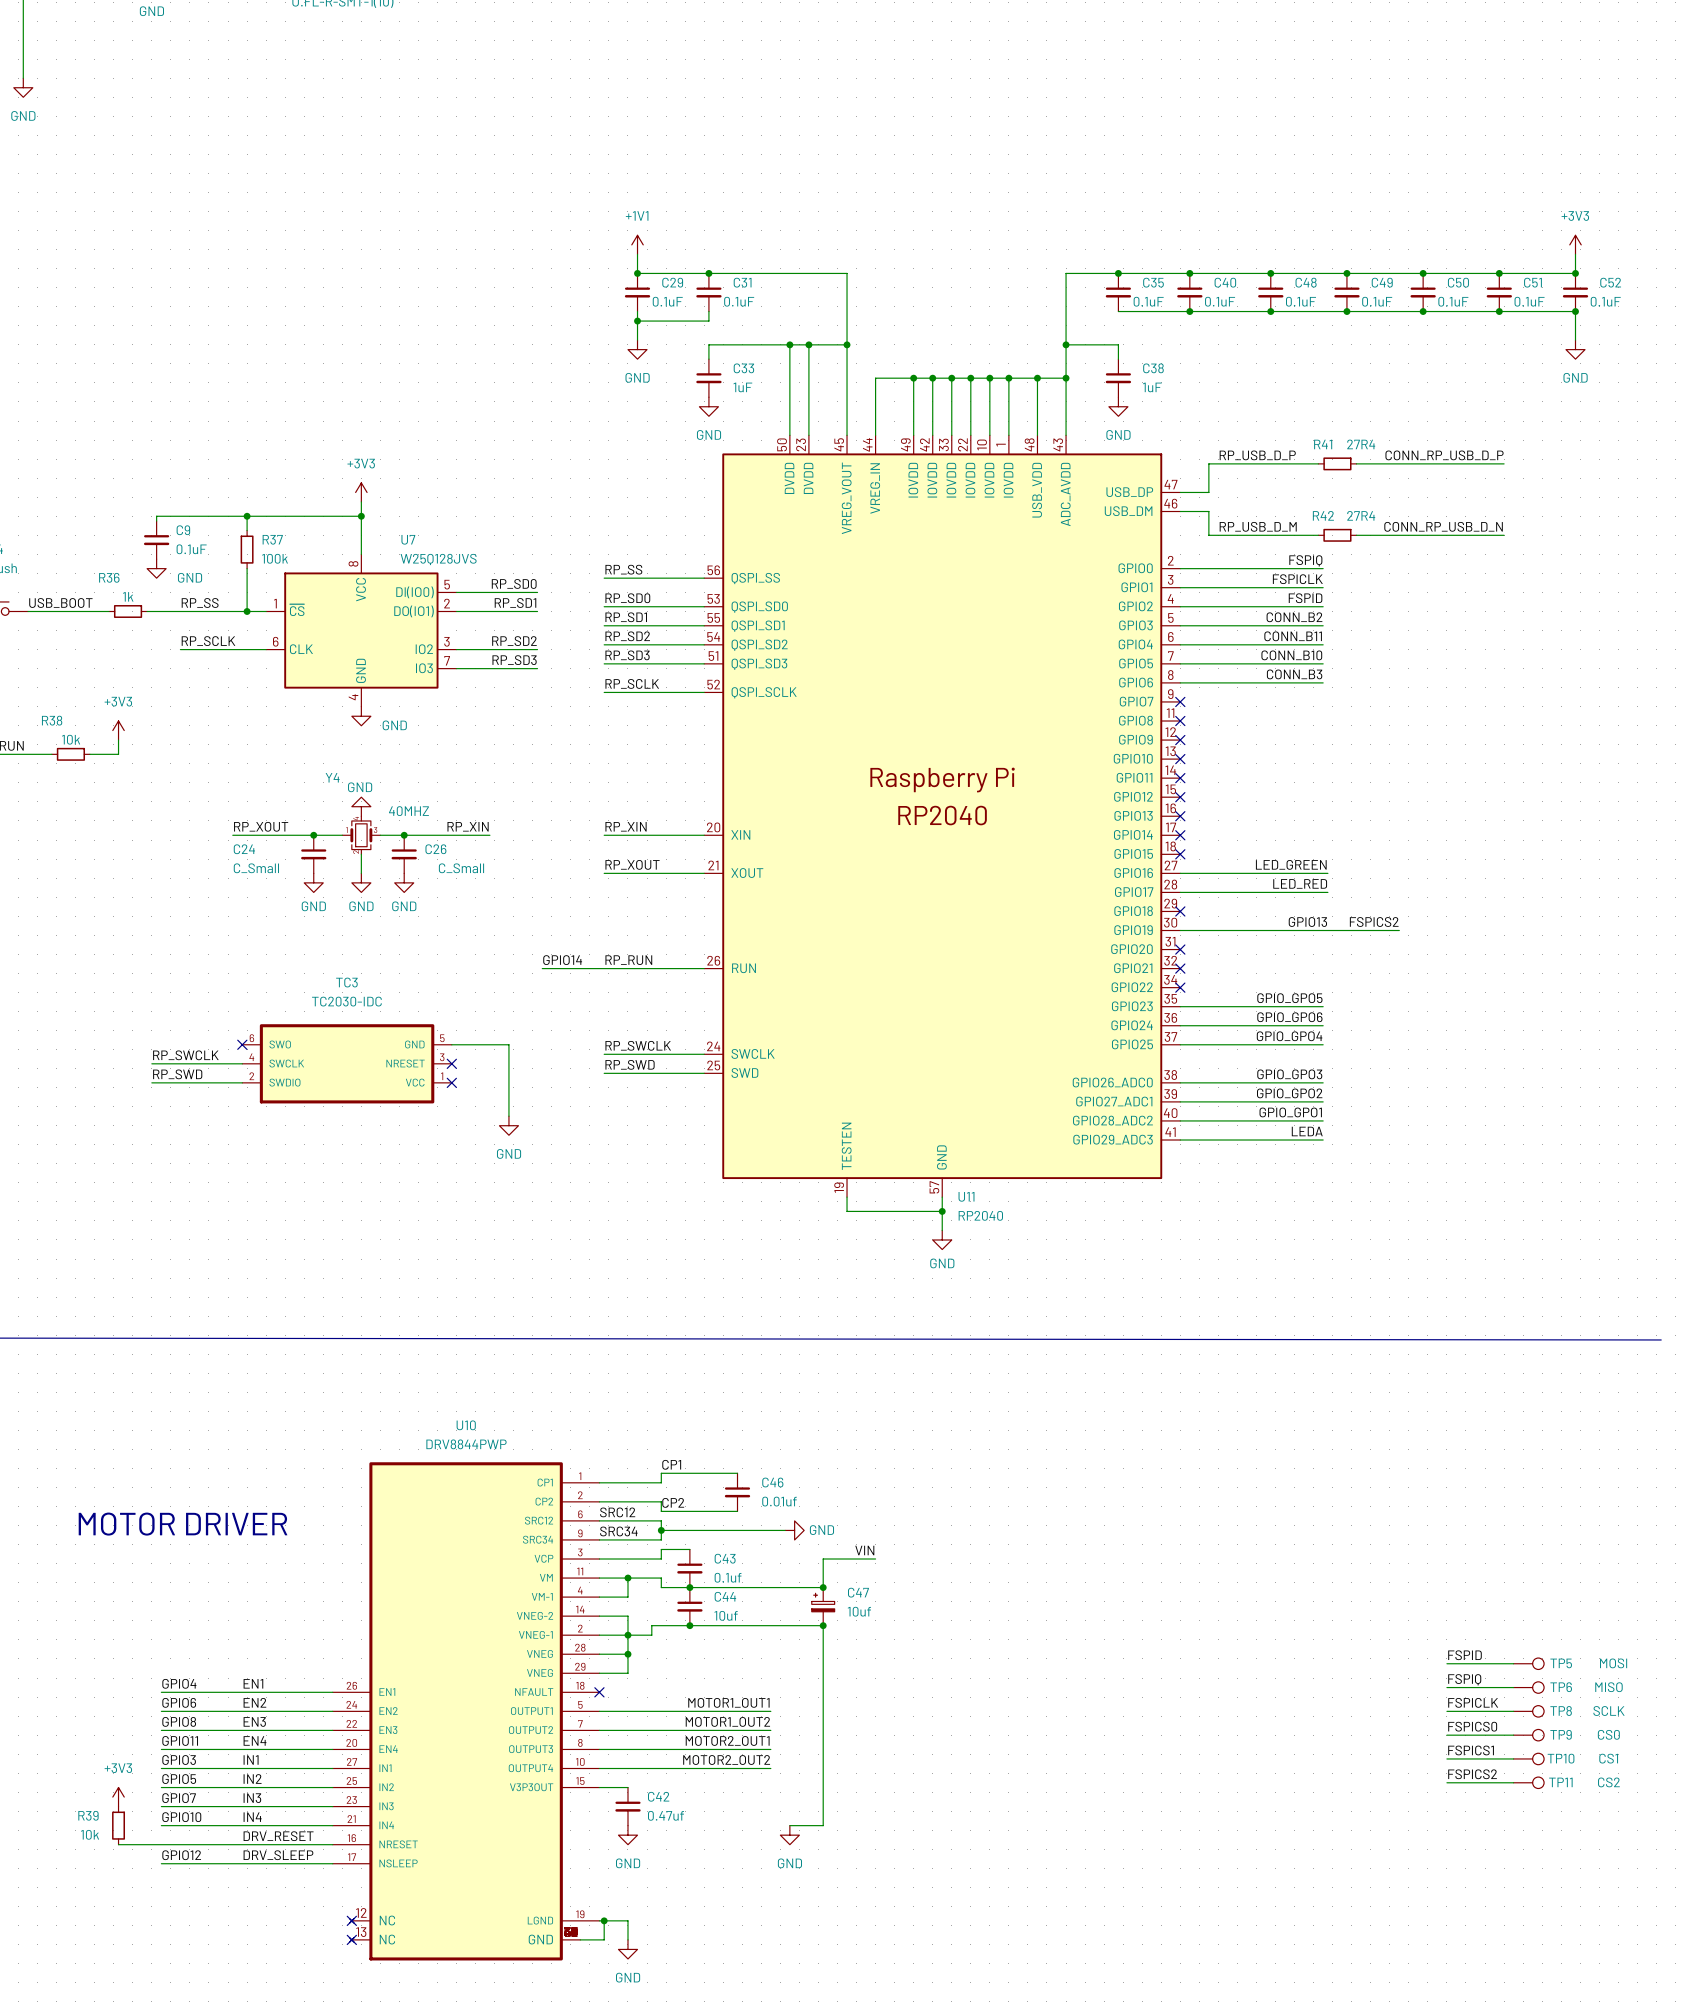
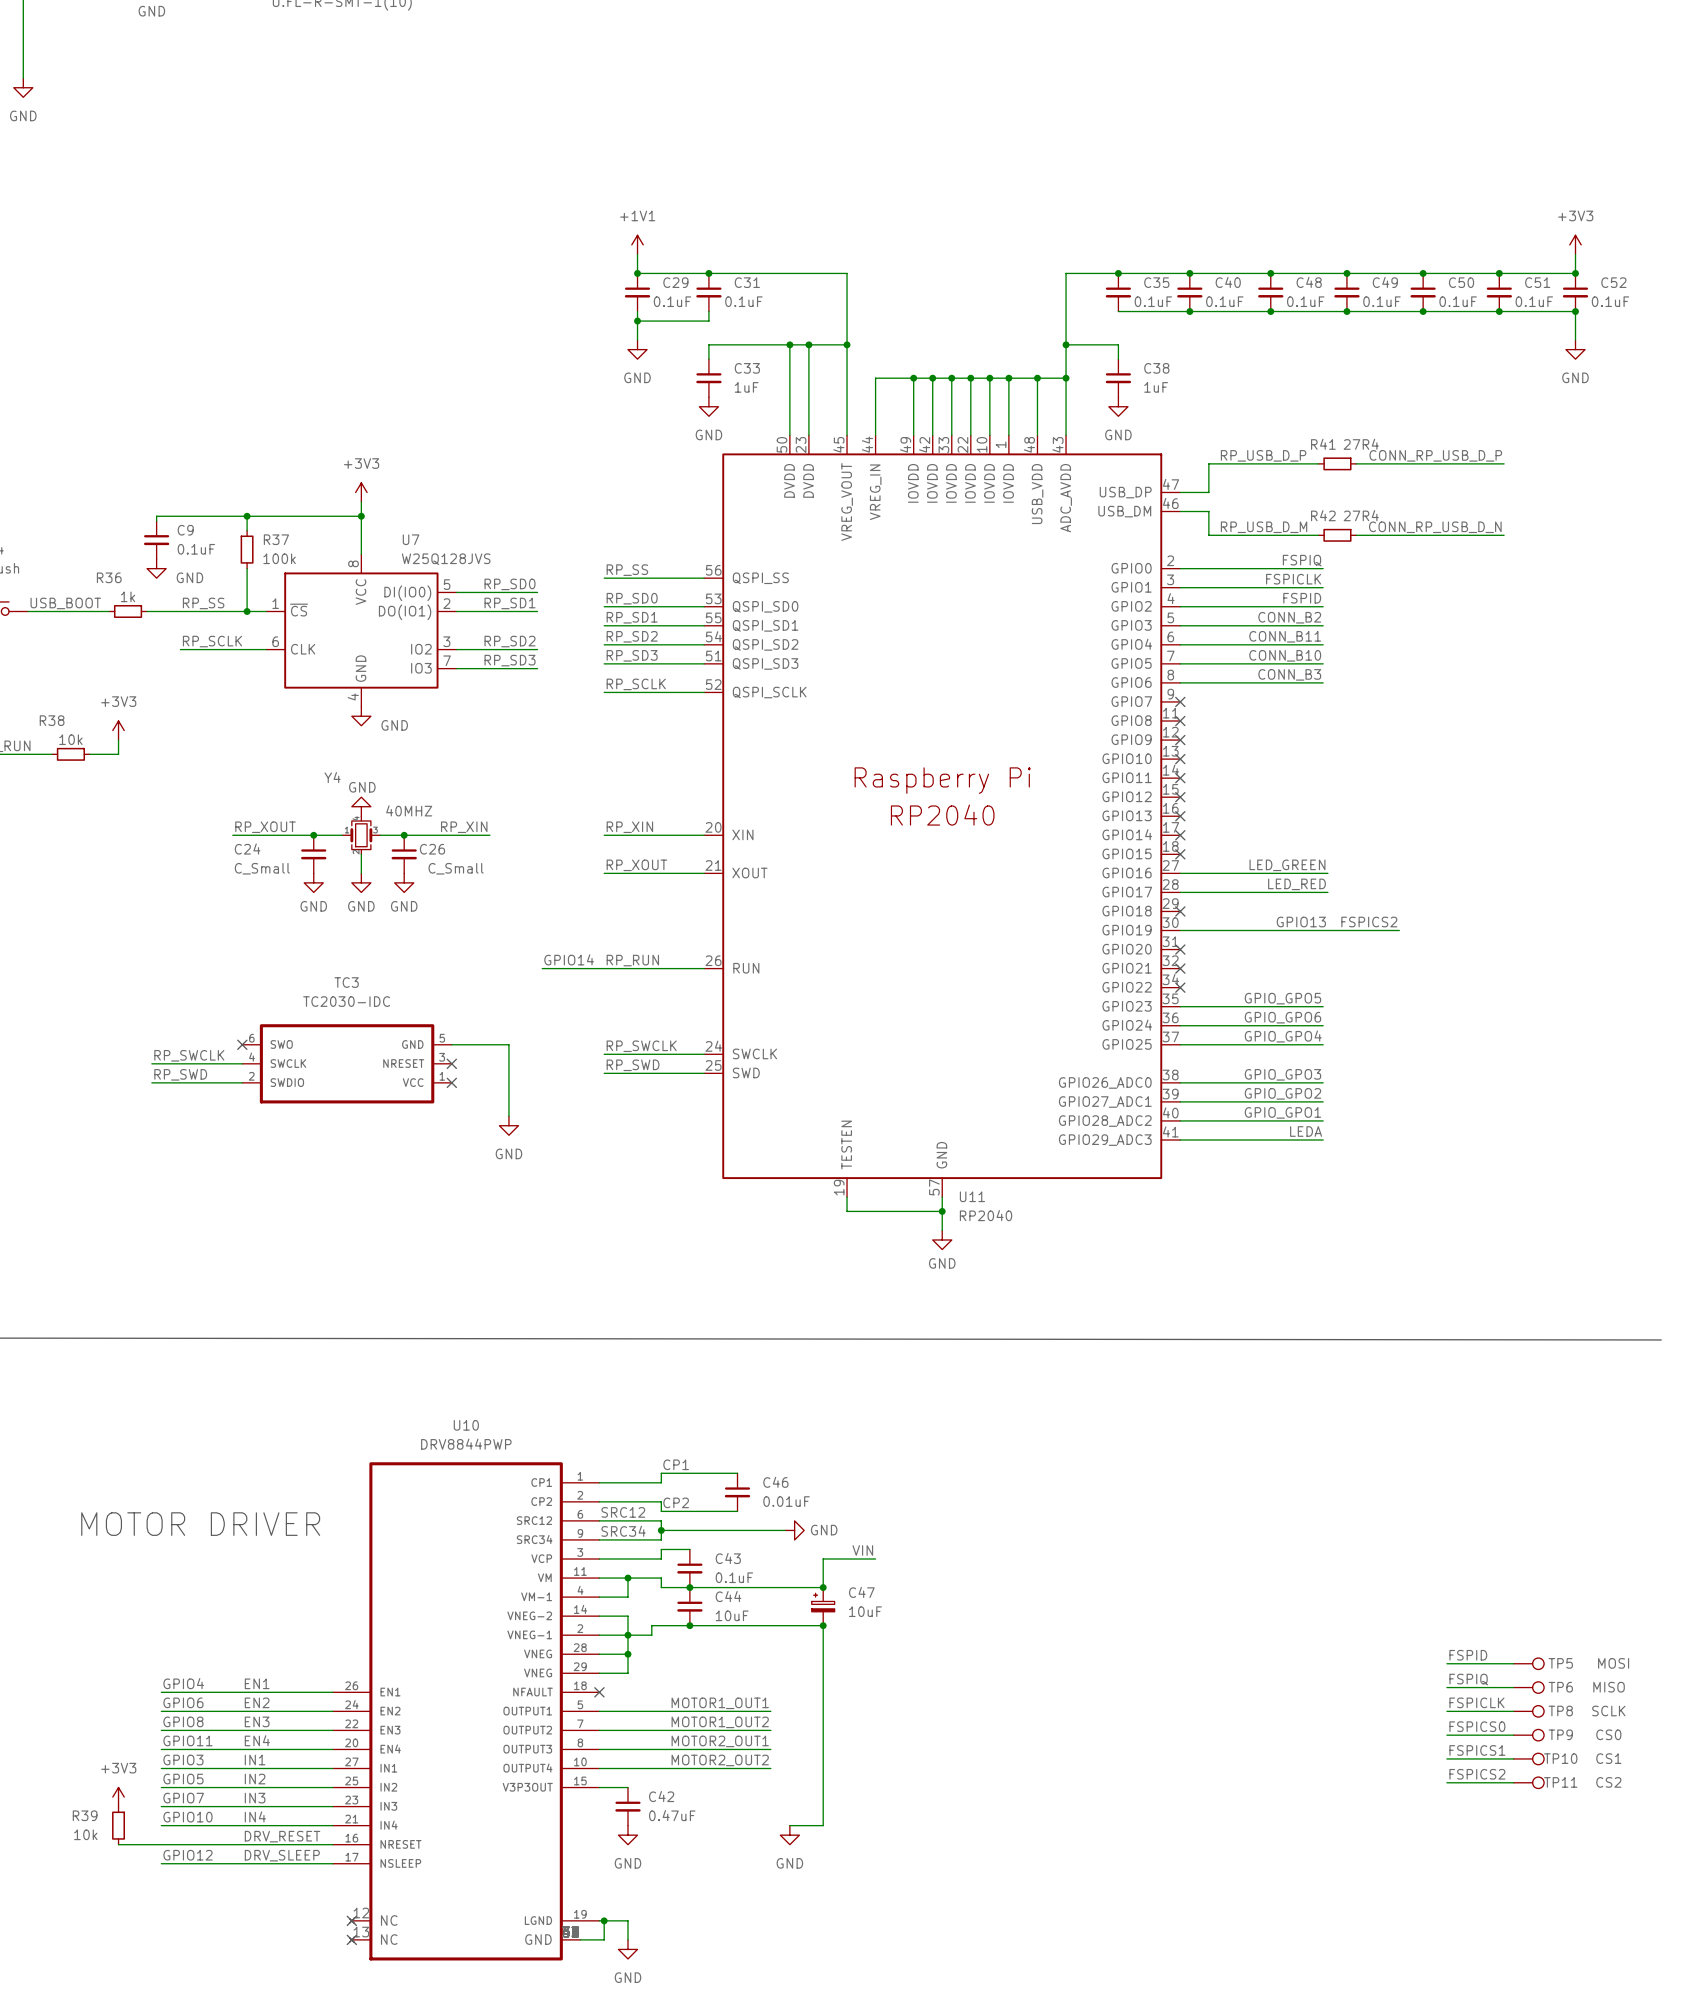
C46 value: 0.01uf (779, 1501) -> 0.01uF (786, 1501)
C43 value: 0.1uf (728, 1577) -> 0.1uF (734, 1577)
C47 value: 10uf (859, 1611) -> 10uF (865, 1611)
C44 value: 10uf (726, 1615) -> 10uF (732, 1615)
C42 value: 0.47uf (665, 1815) -> 0.47uF (672, 1815)

